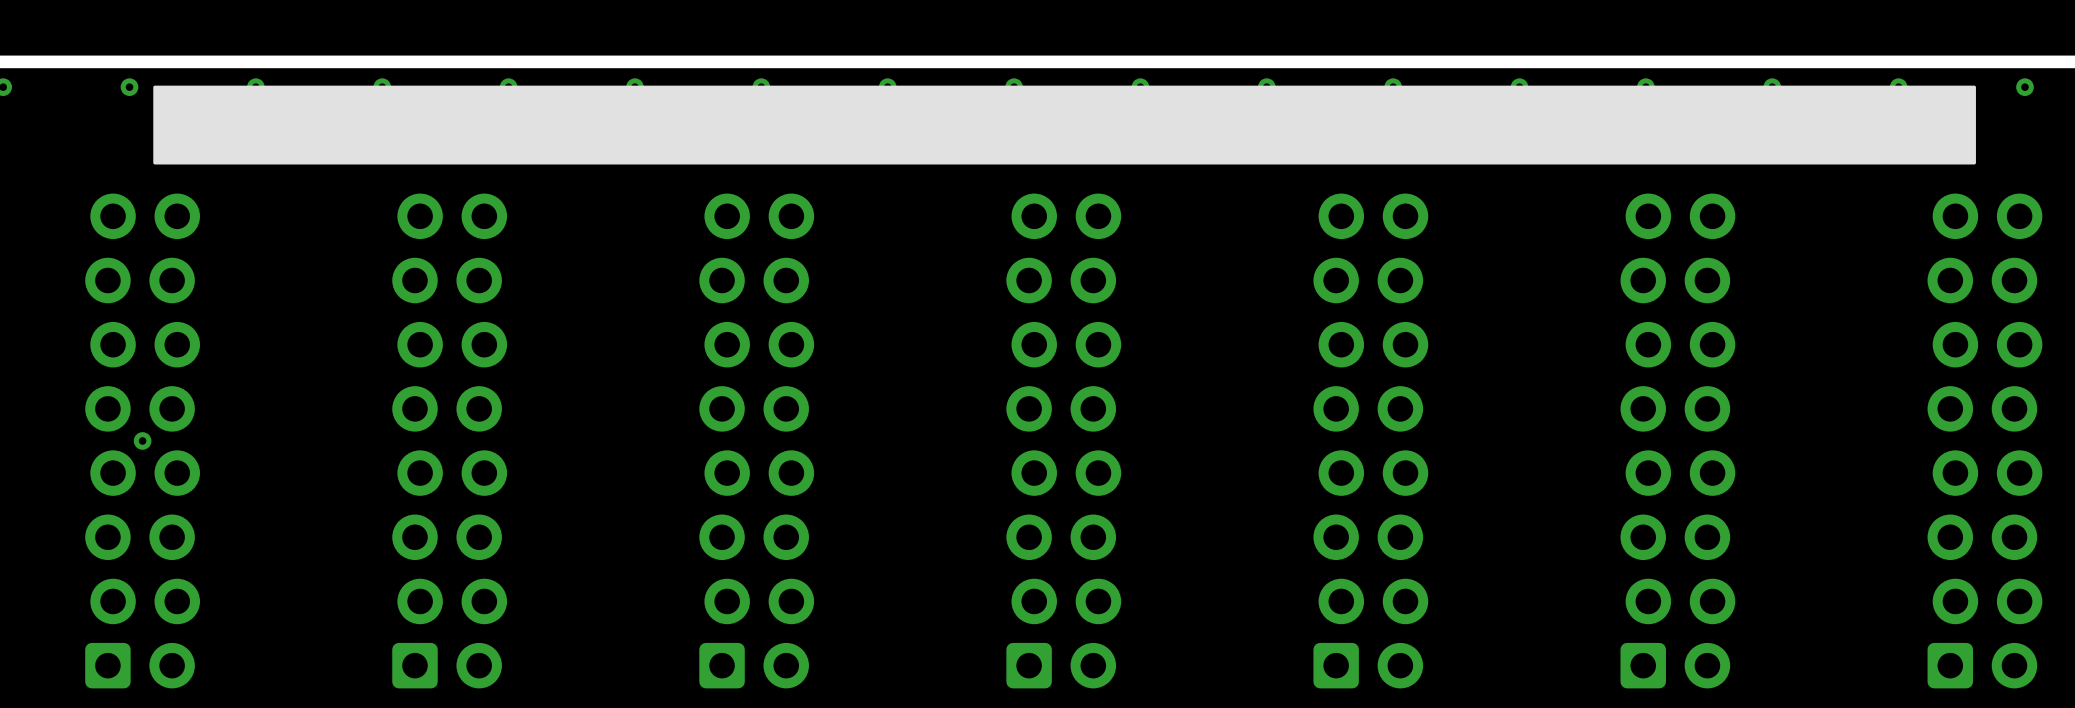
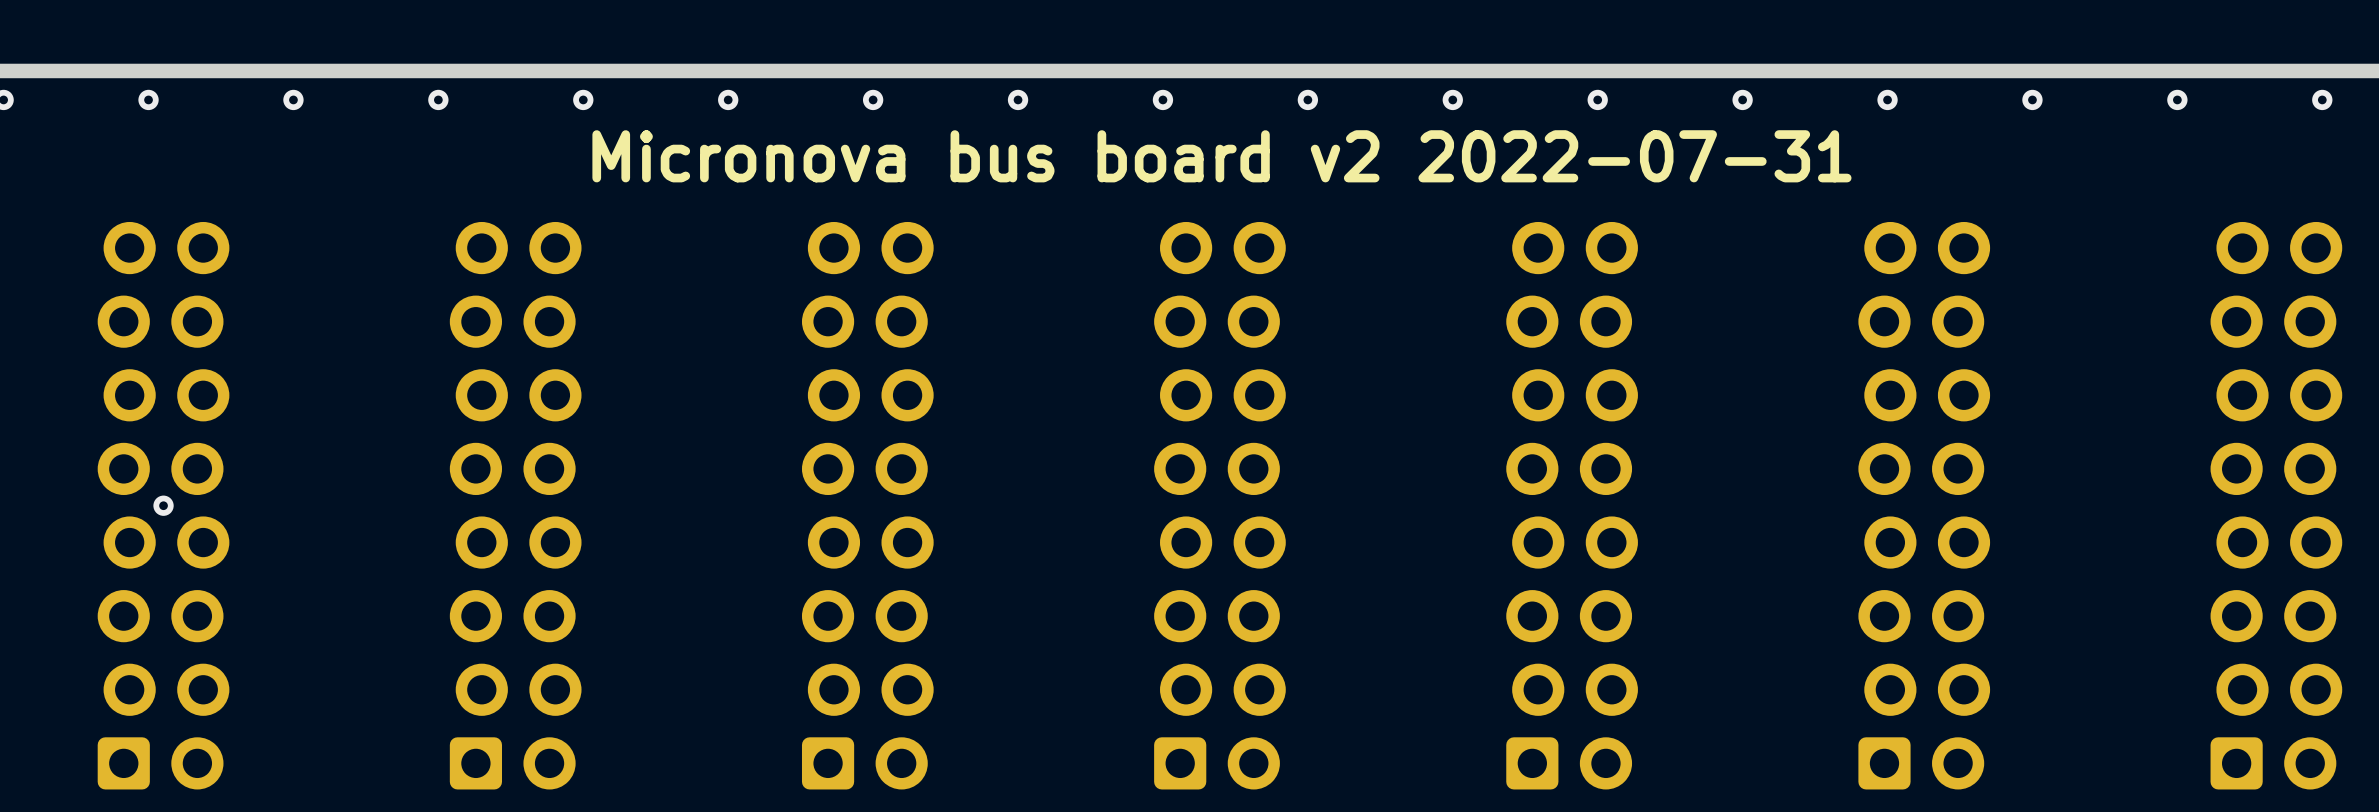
drawing: [153, 85, 1976, 165] -> none
text: none -> Micronova bus board v2 2022-07-31 (1221, 156)

